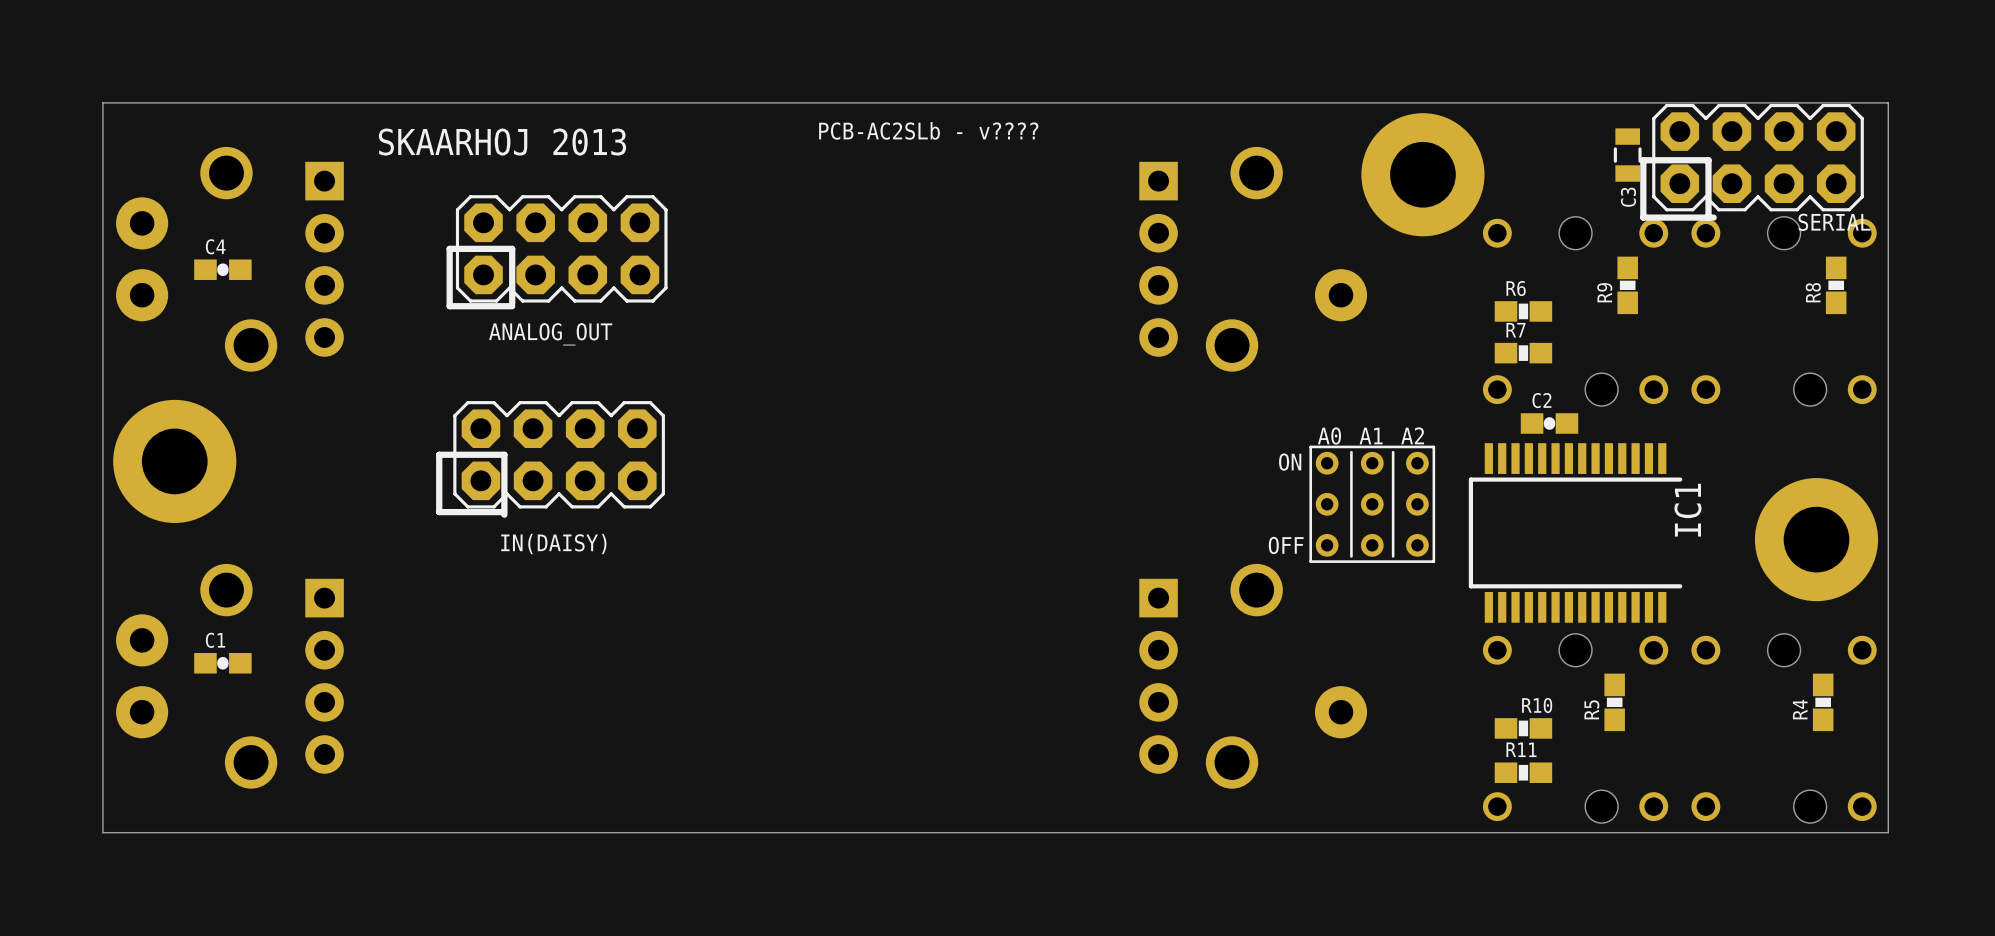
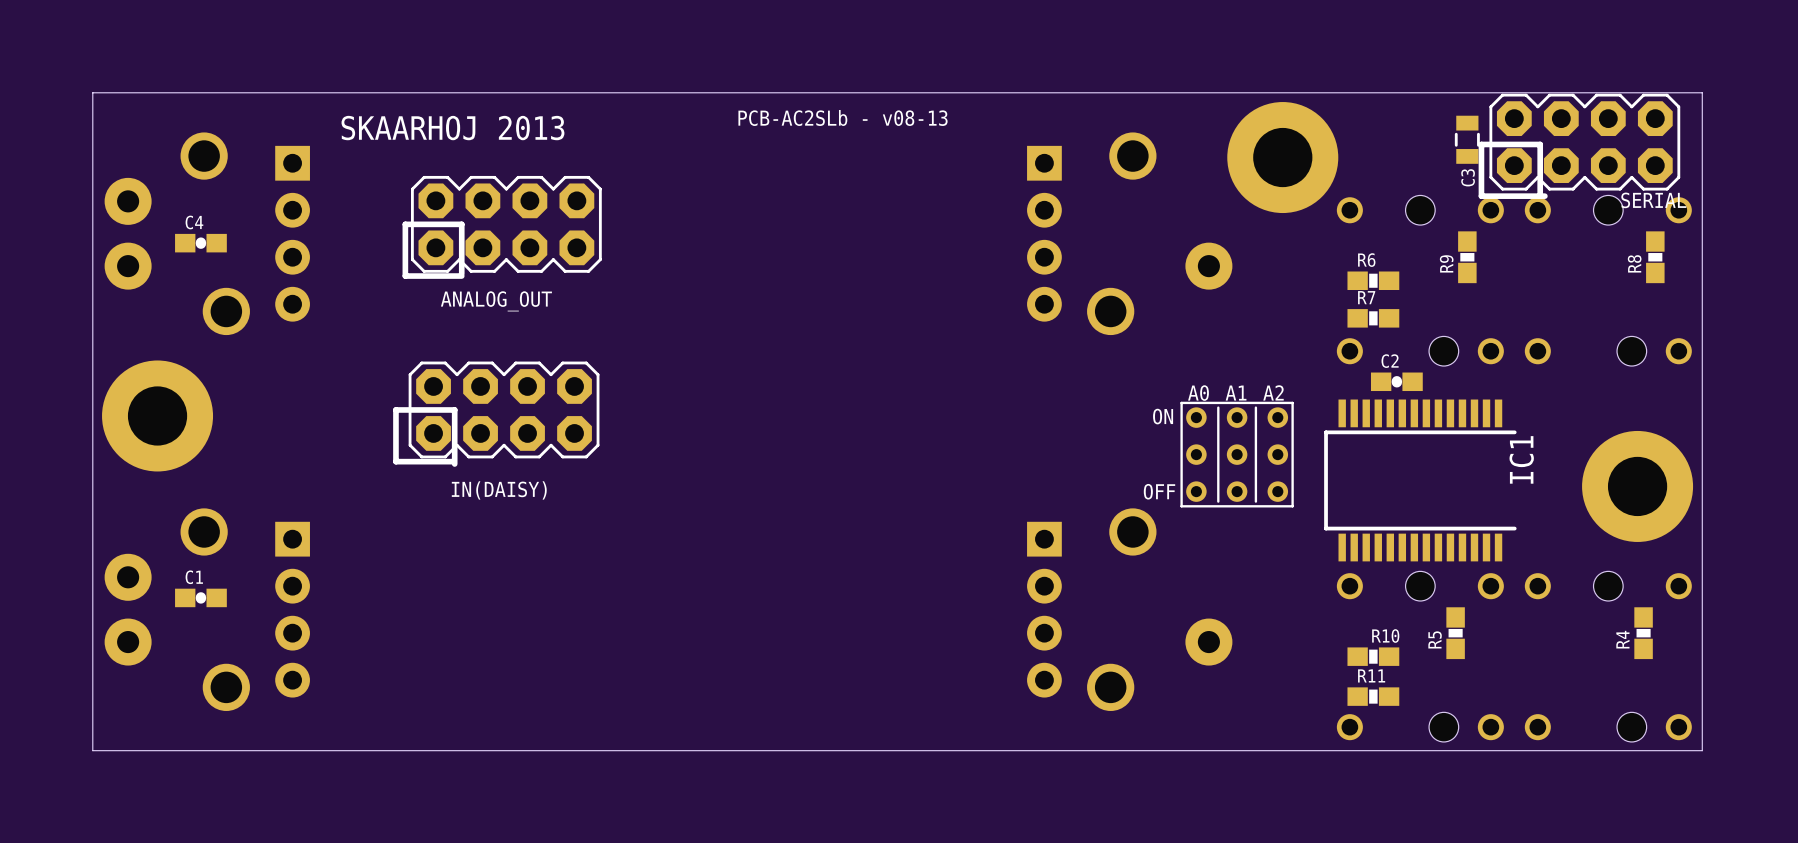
text: PCB-AC2SLb - v???? (928, 130) -> PCB-AC2SLb - v08-13 (843, 117)

